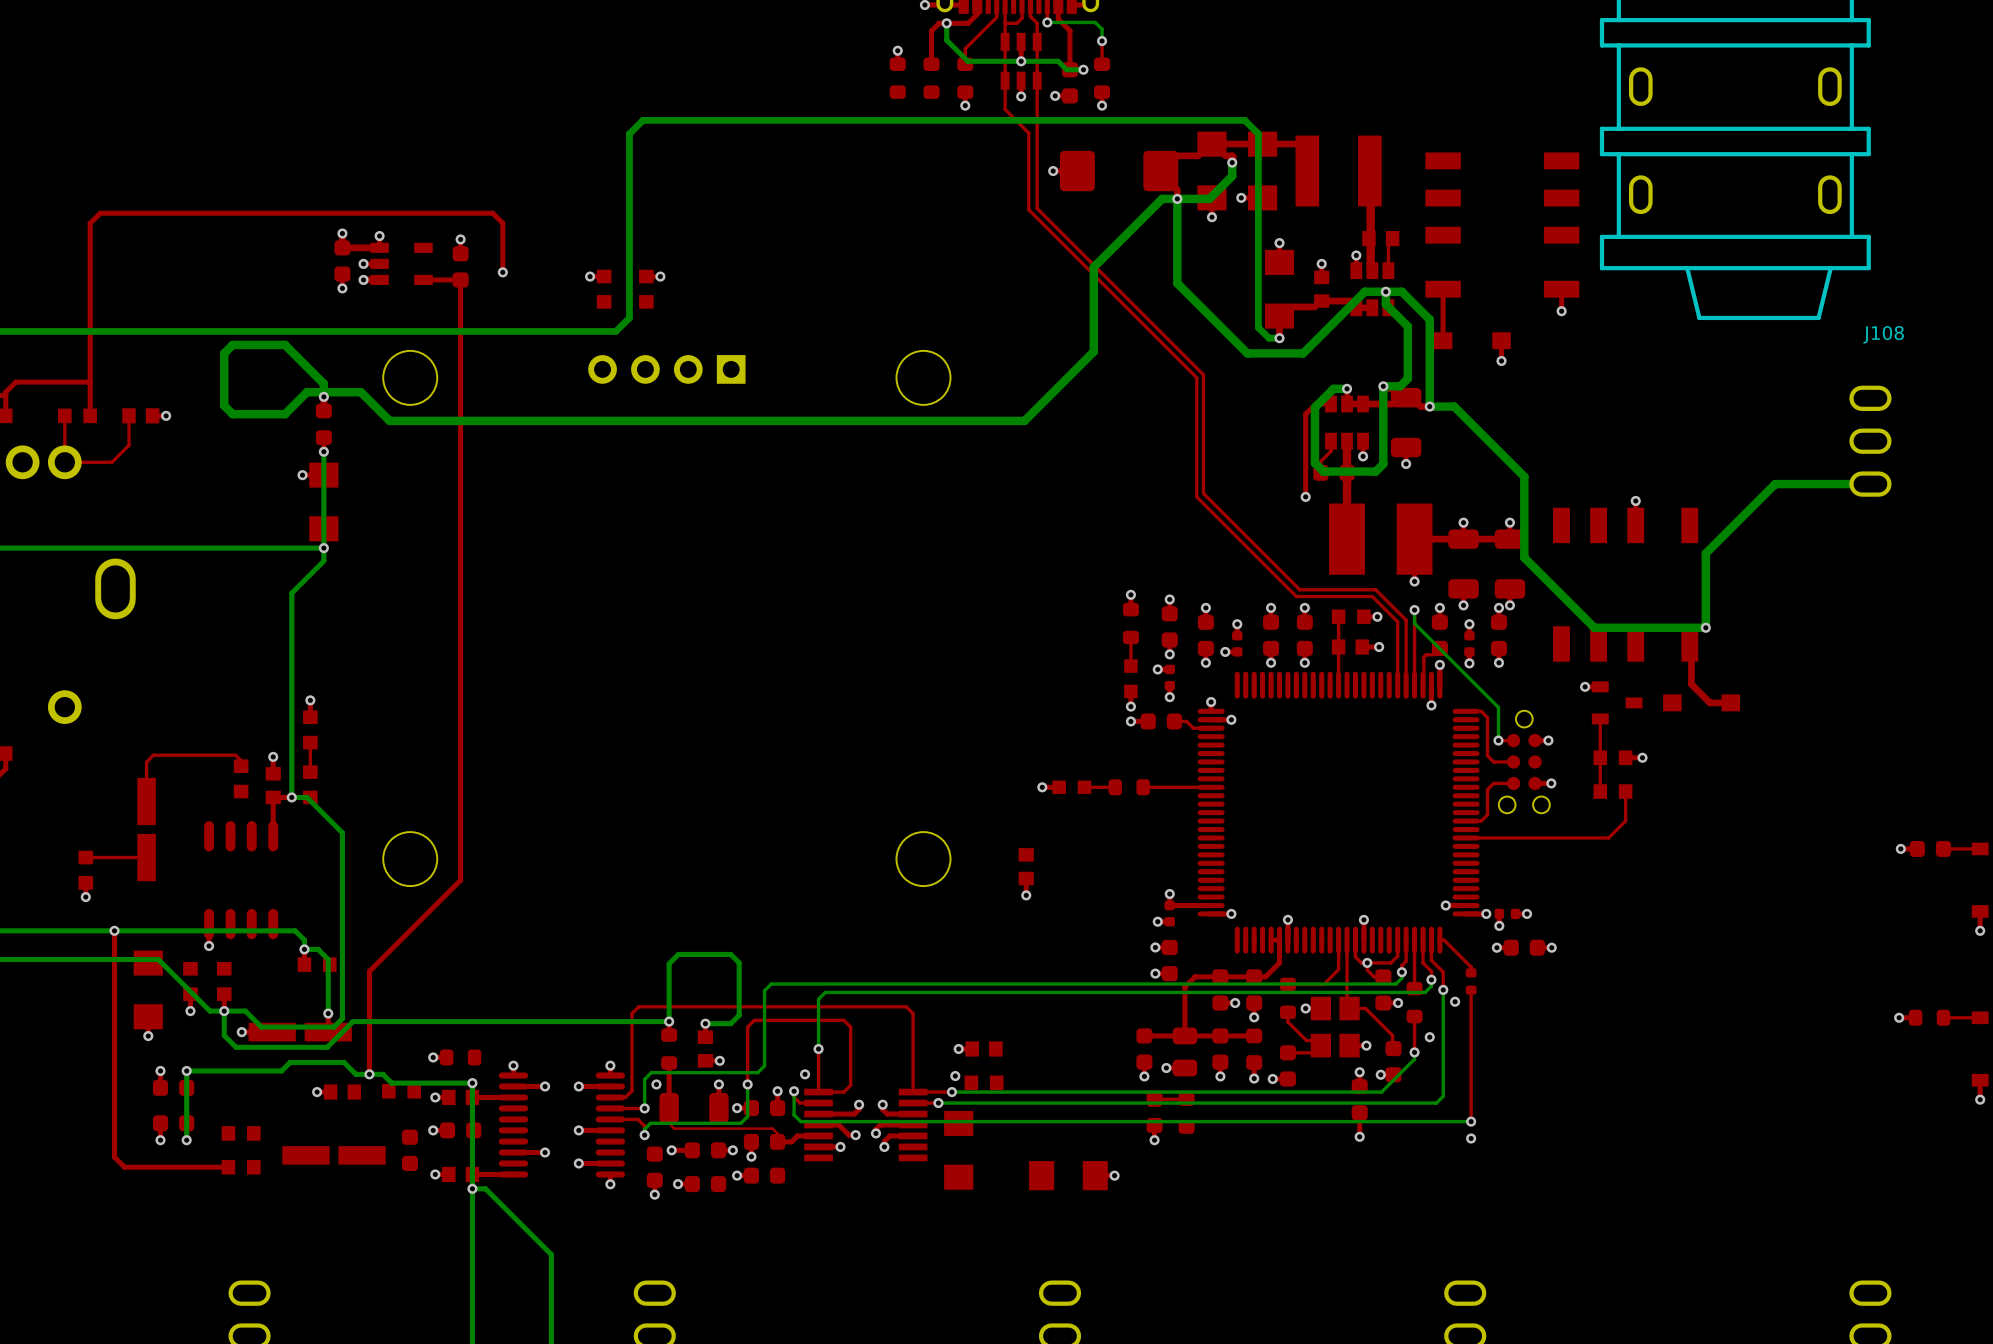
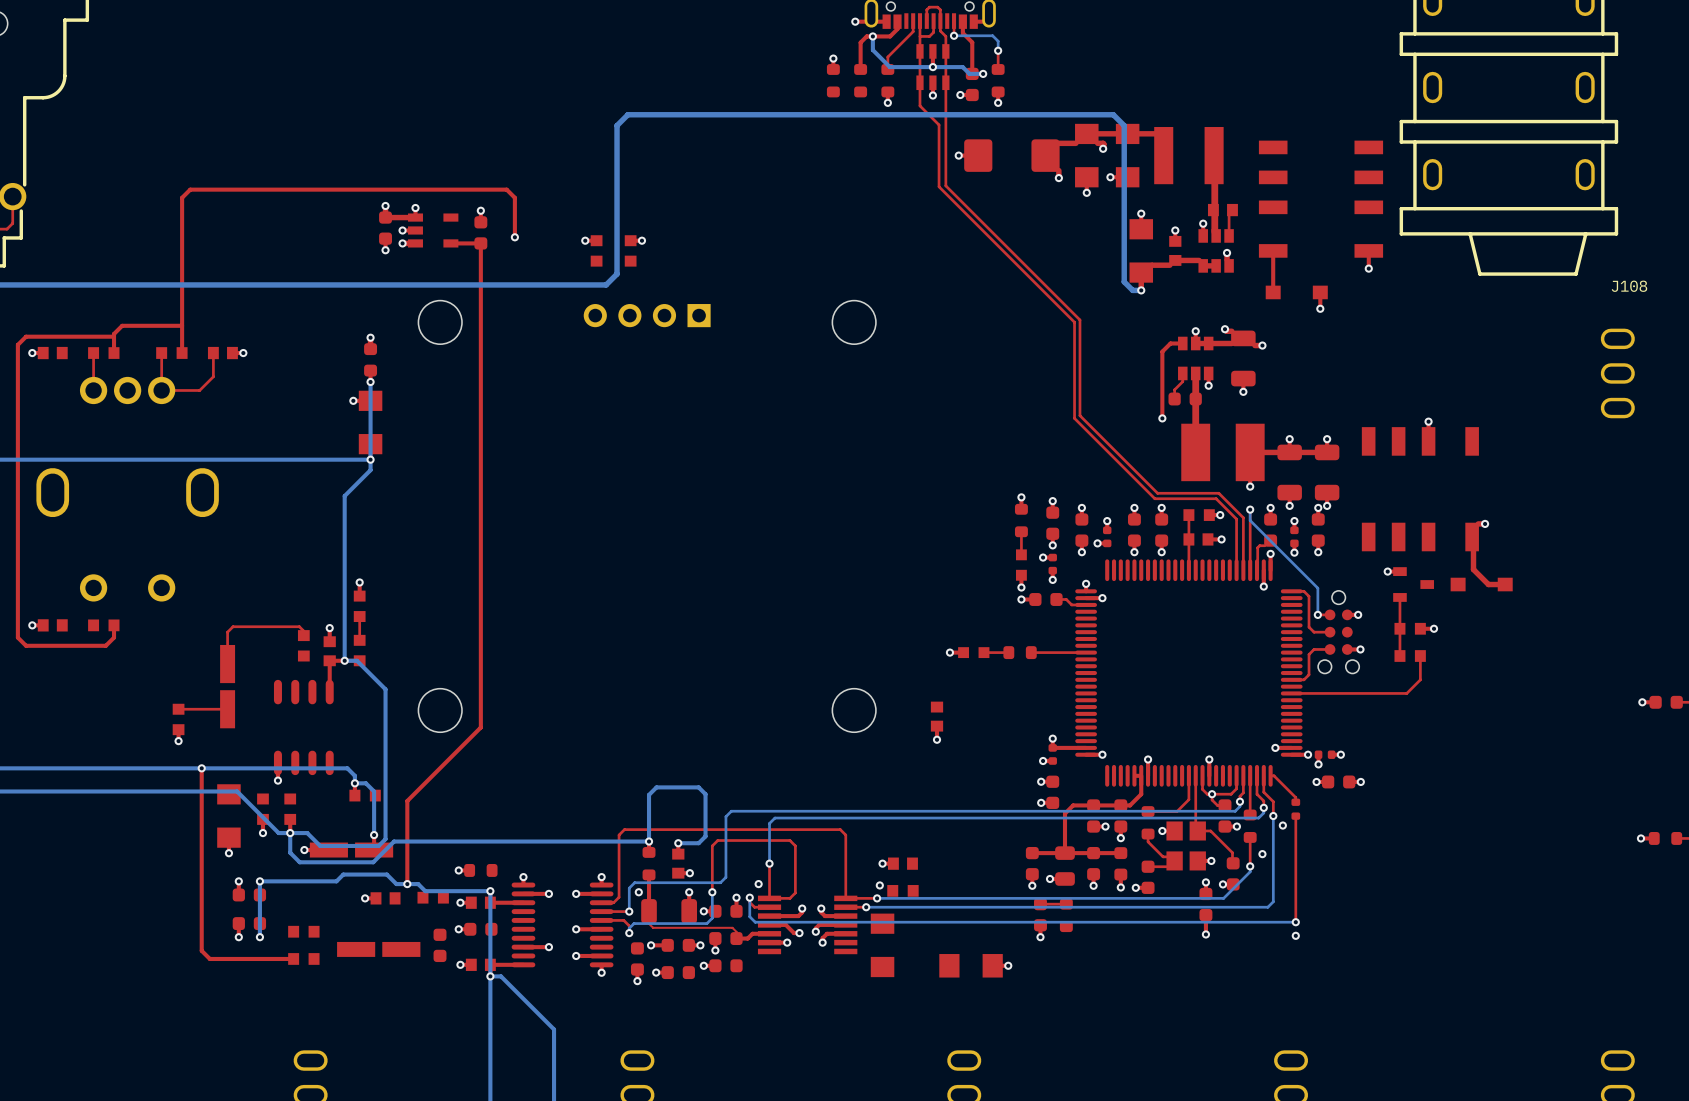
bottom track: (1232, 162) (1232, 176) (1209, 198) (1162, 198) (1093, 267) (1093, 351) (1024, 420) (389, 420) (361, 392) (306, 392) (285, 414) (232, 414) (224, 405) (224, 353) (232, 344) (285, 344) (323, 383) (323, 396) -> none
bottom track: (1177, 198) (1177, 283) (1247, 353) (1303, 353) (1364, 291) (1401, 291) (1429, 319) (1429, 406) (1454, 406) (1524, 476) (1524, 557) (1594, 627) (1705, 627) (1705, 553) (1775, 484) (1870, 484) -> none
bottom track: (1385, 291) (1385, 304) (1407, 326) (1407, 378) (1400, 386) (1383, 386) (1383, 463) (1375, 471) (1323, 471) (1314, 463) (1314, 407) (1333, 388) (1347, 388) -> none

